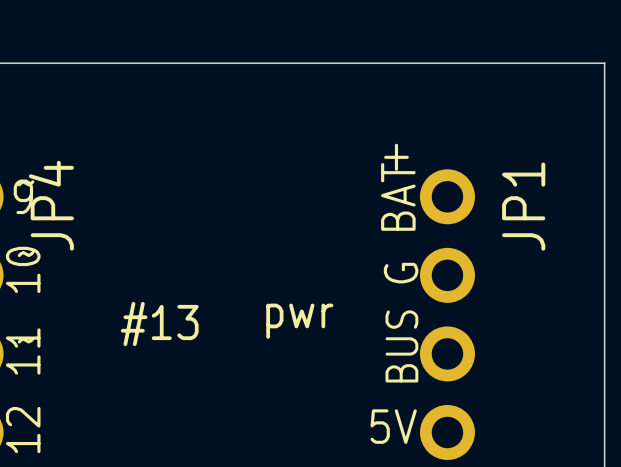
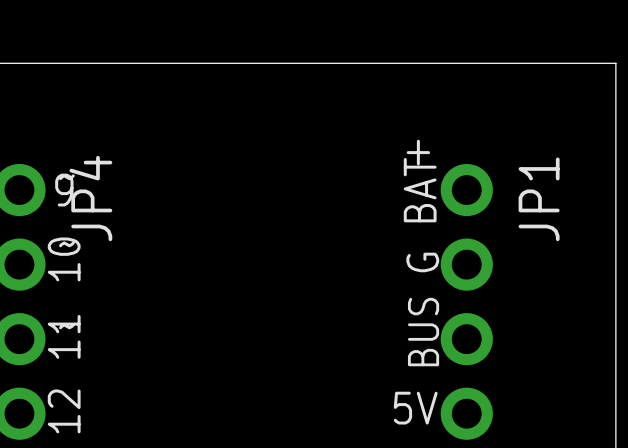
text: pwr (299, 321) -> none
text: #13 (159, 323) -> none

